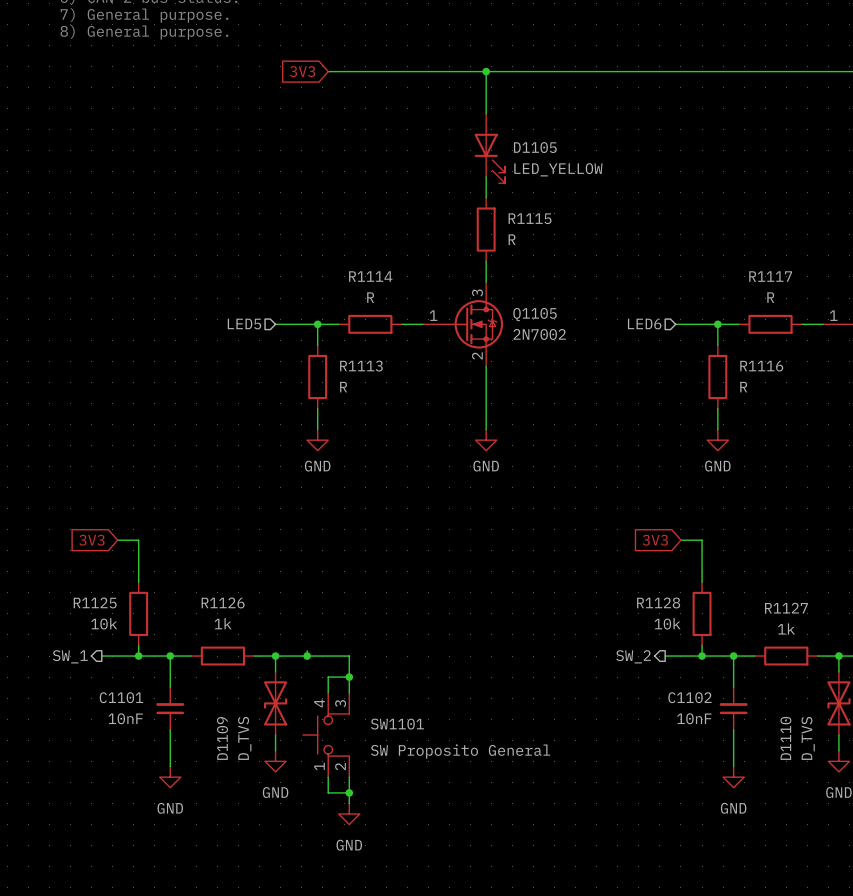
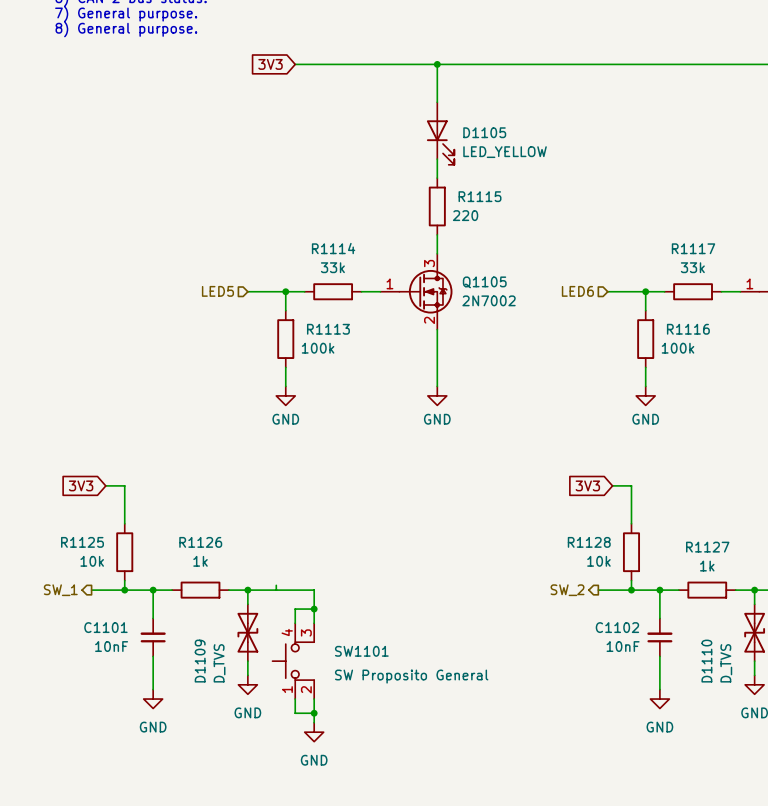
R1115 value: R (512, 239) -> 220 (465, 215)
R1114 value: R (370, 297) -> 33k (332, 267)
R1117 value: R (770, 297) -> 33k (692, 267)
R1113 value: R (343, 387) -> 100k (318, 348)
R1116 value: R (743, 387) -> 100k (678, 348)
junction: (307, 656) -> none

